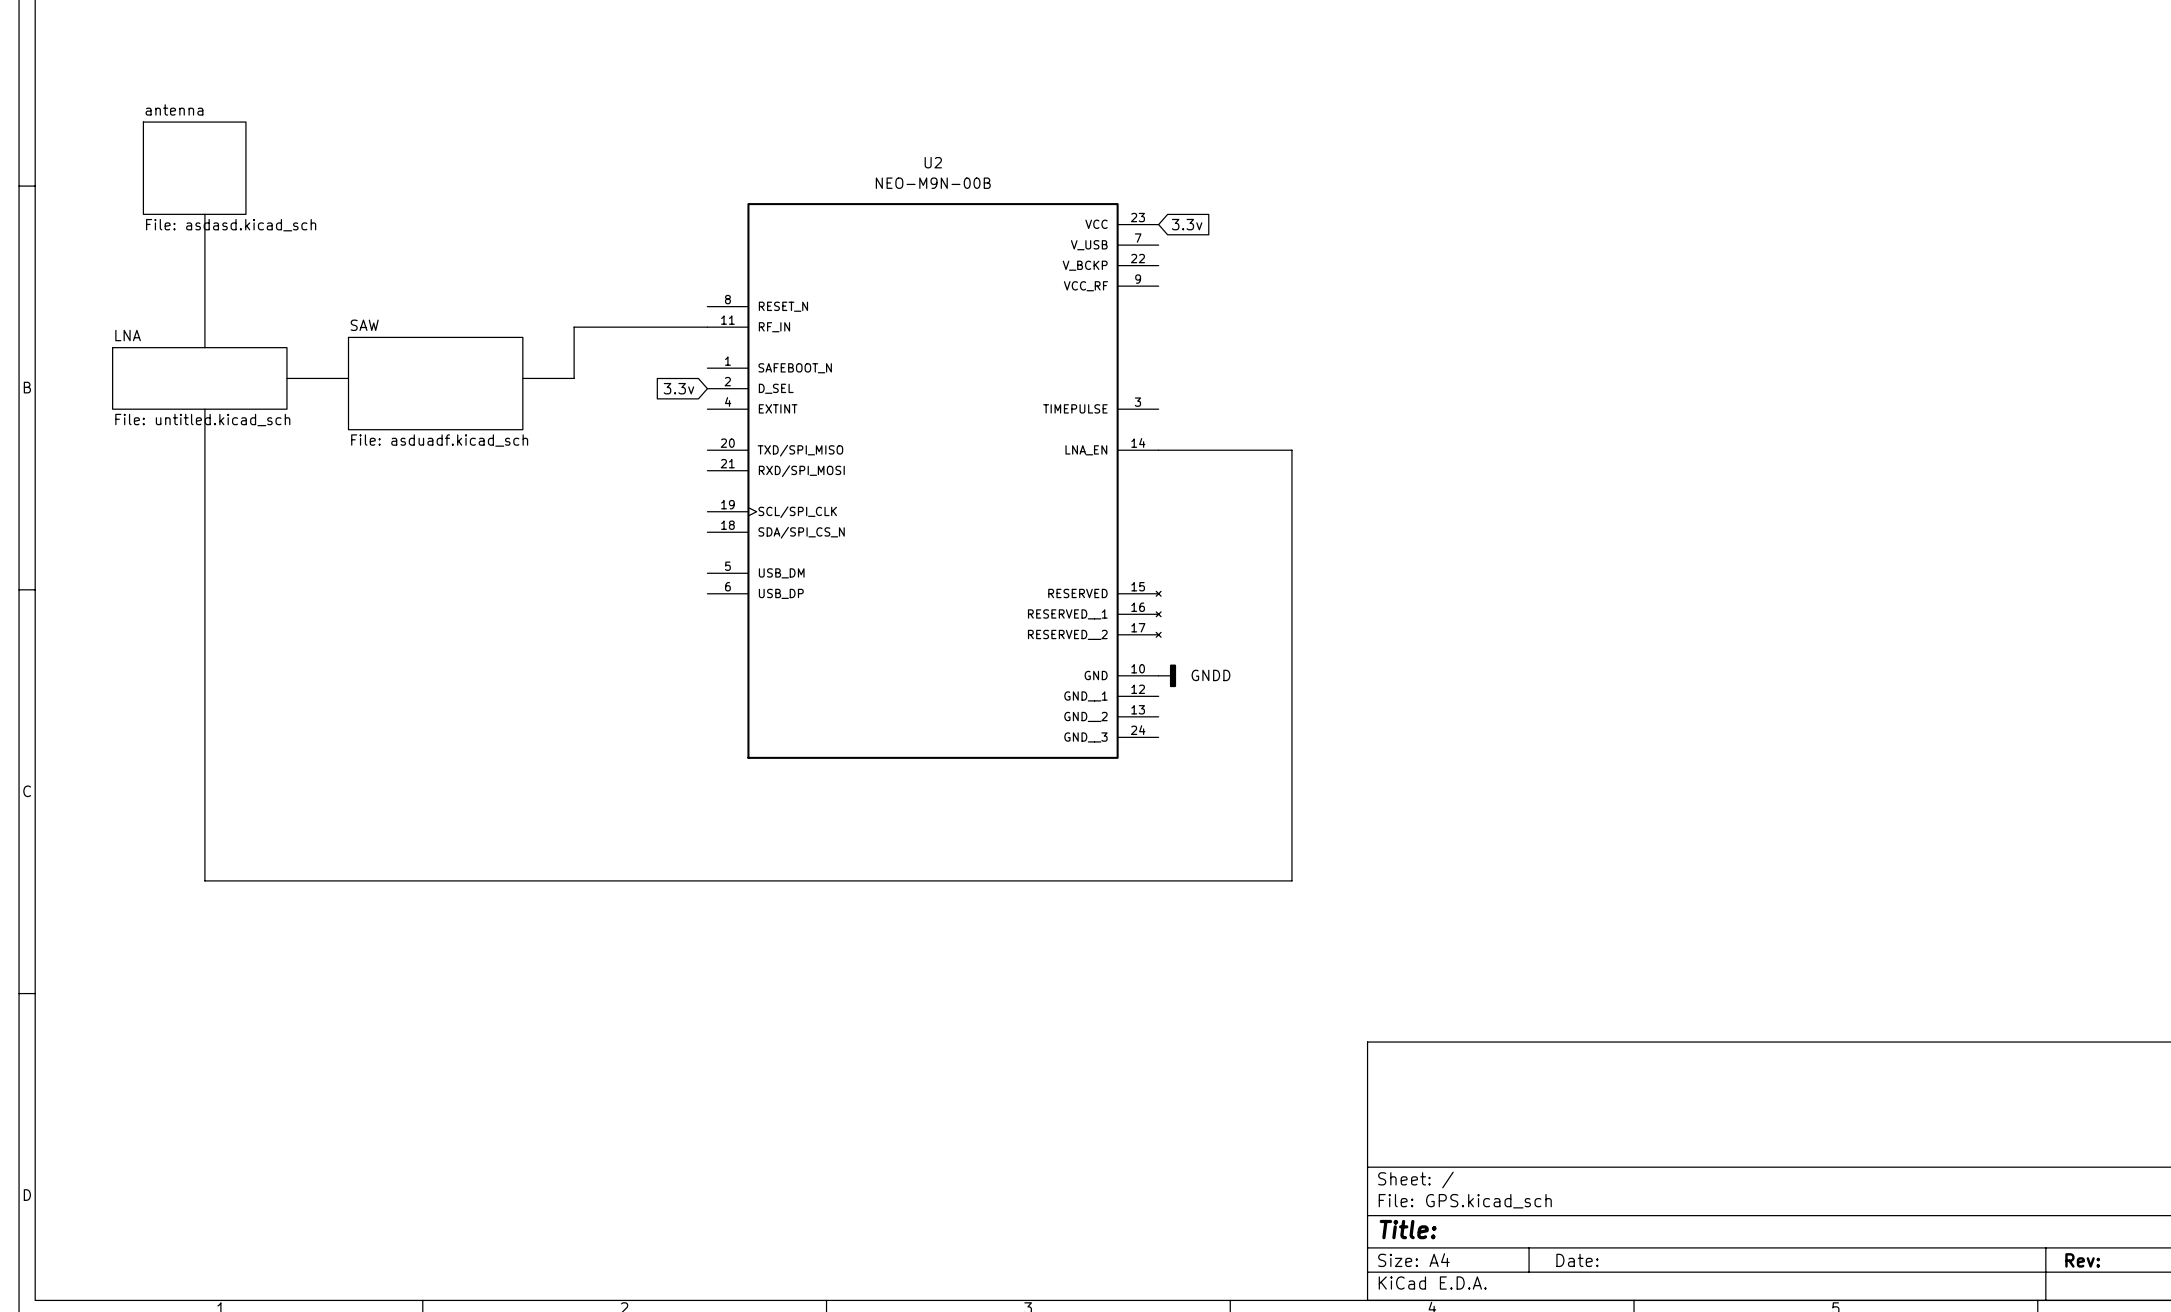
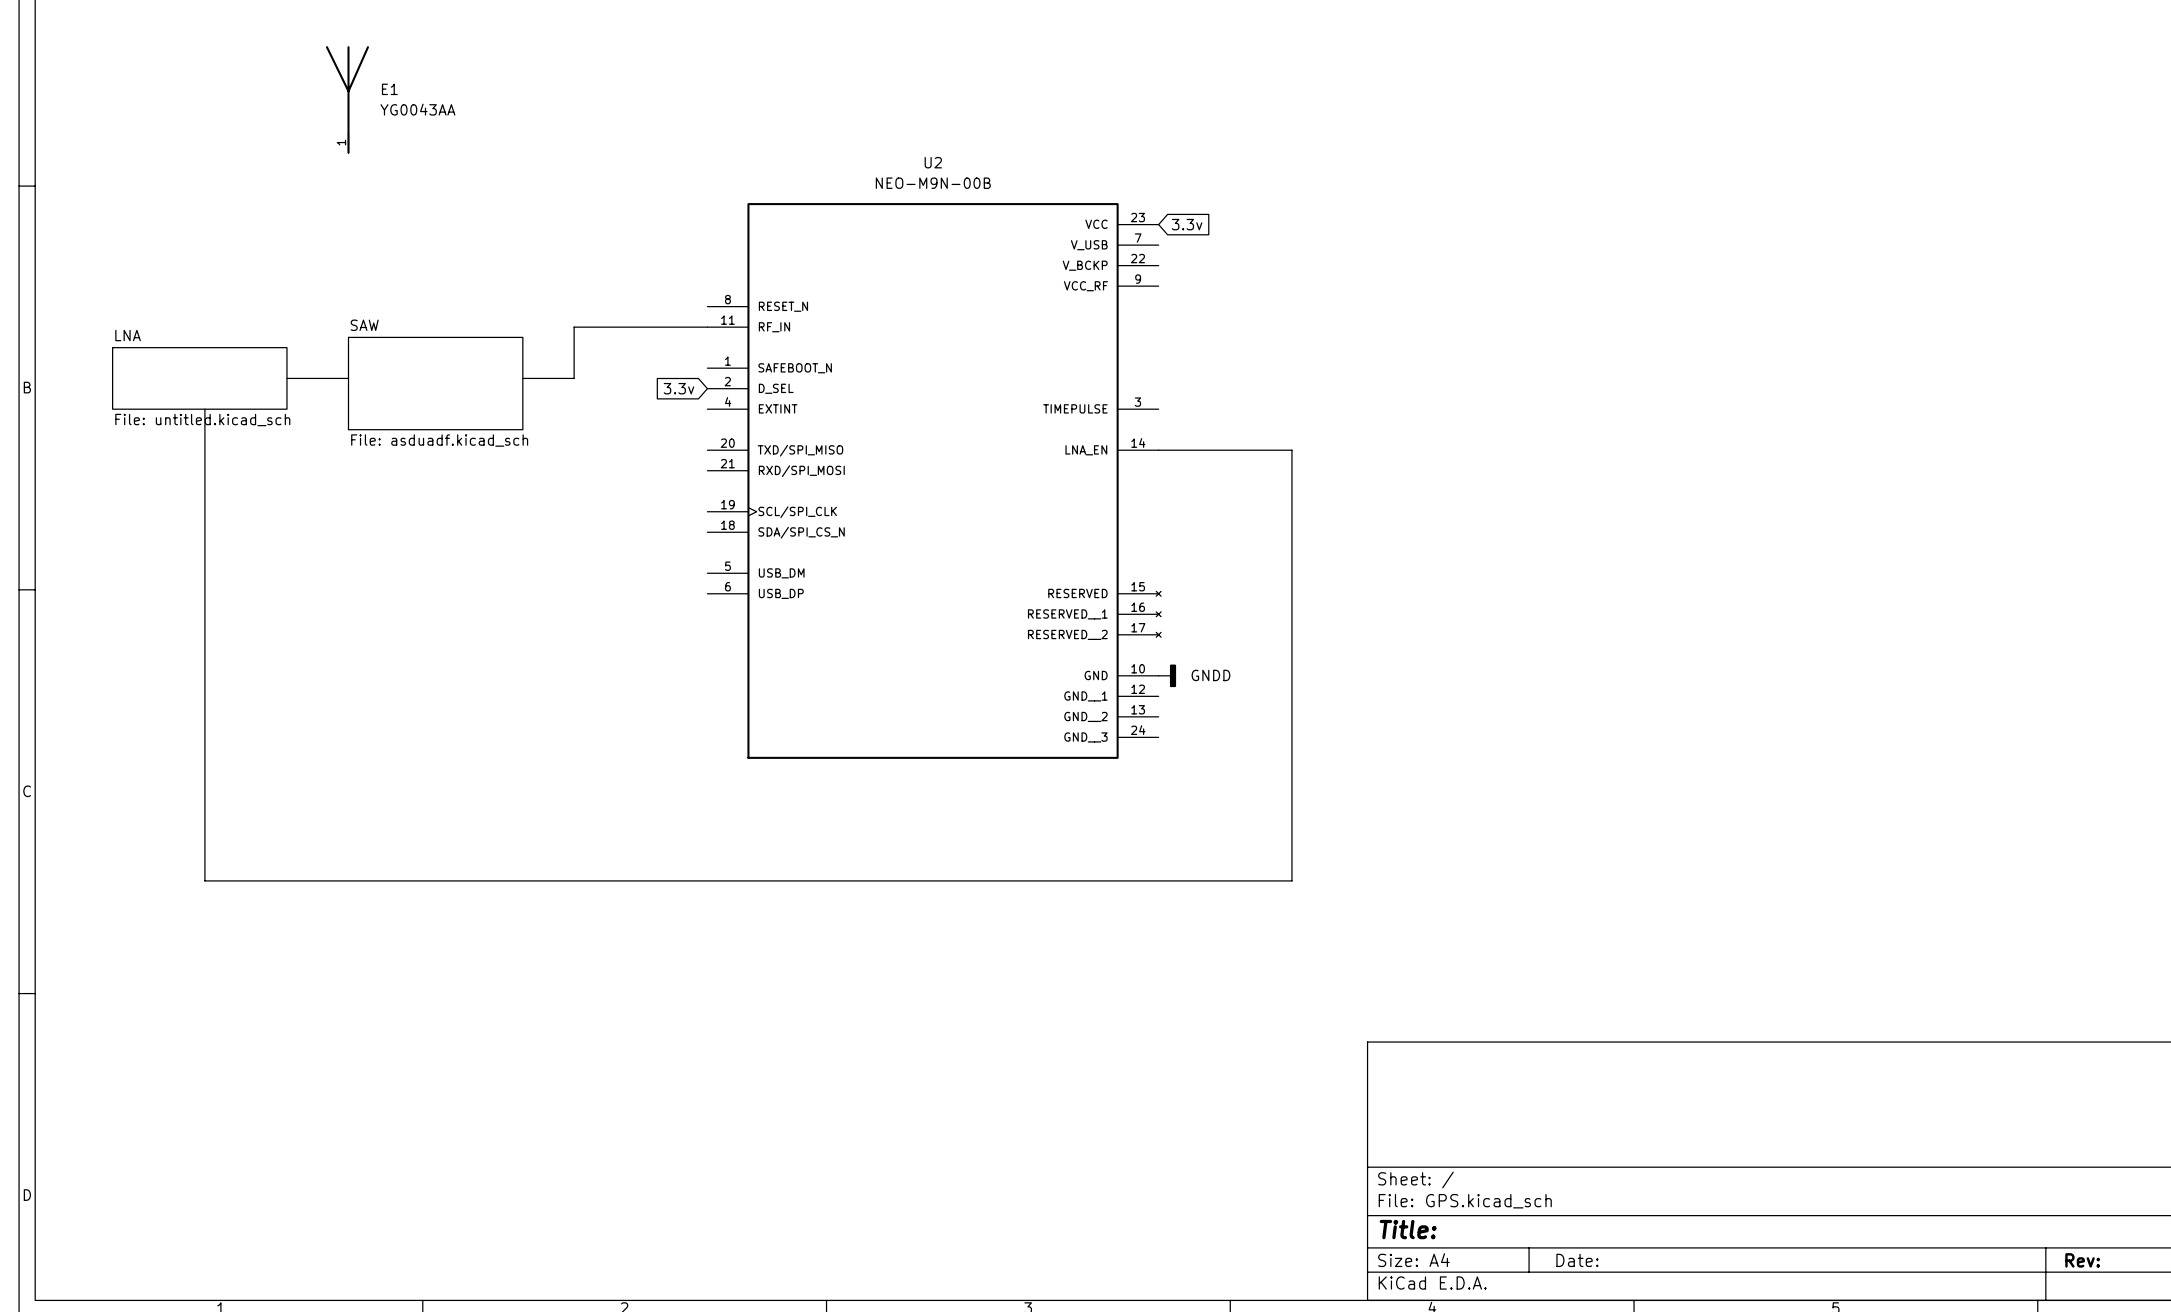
E1: none -> YG0043AA (347, 100)
sheet antenna: File: asdasd.kicad_sch (194, 168) -> none
wire: (204, 214) (204, 347) -> none

